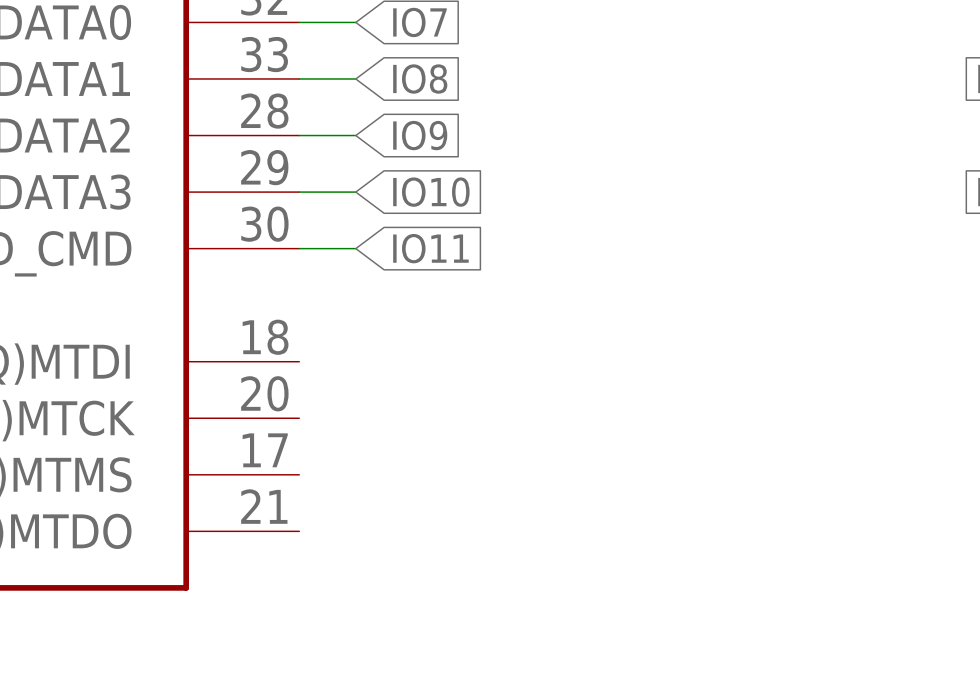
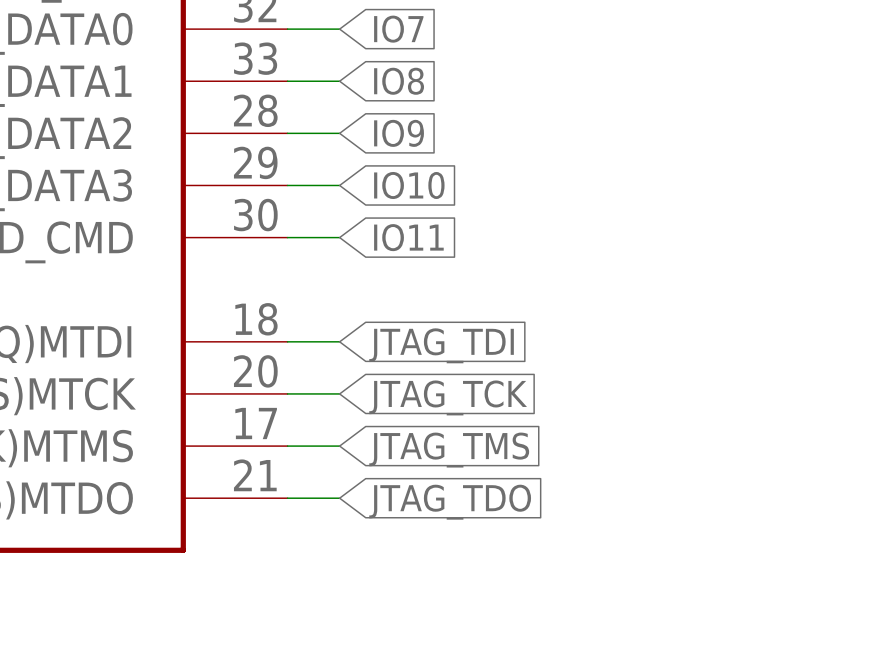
wire: none -> (287, 341) (339, 341)
global label: none -> JTAG_TDI (441, 345)
wire: none -> (287, 393) (339, 393)
global label: none -> JTAG_TCK (448, 397)
wire: none -> (287, 446) (339, 446)
global label: none -> JTAG_TMS (449, 450)
wire: none -> (287, 498) (339, 498)
global label: none -> JTAG_TDO (450, 502)

